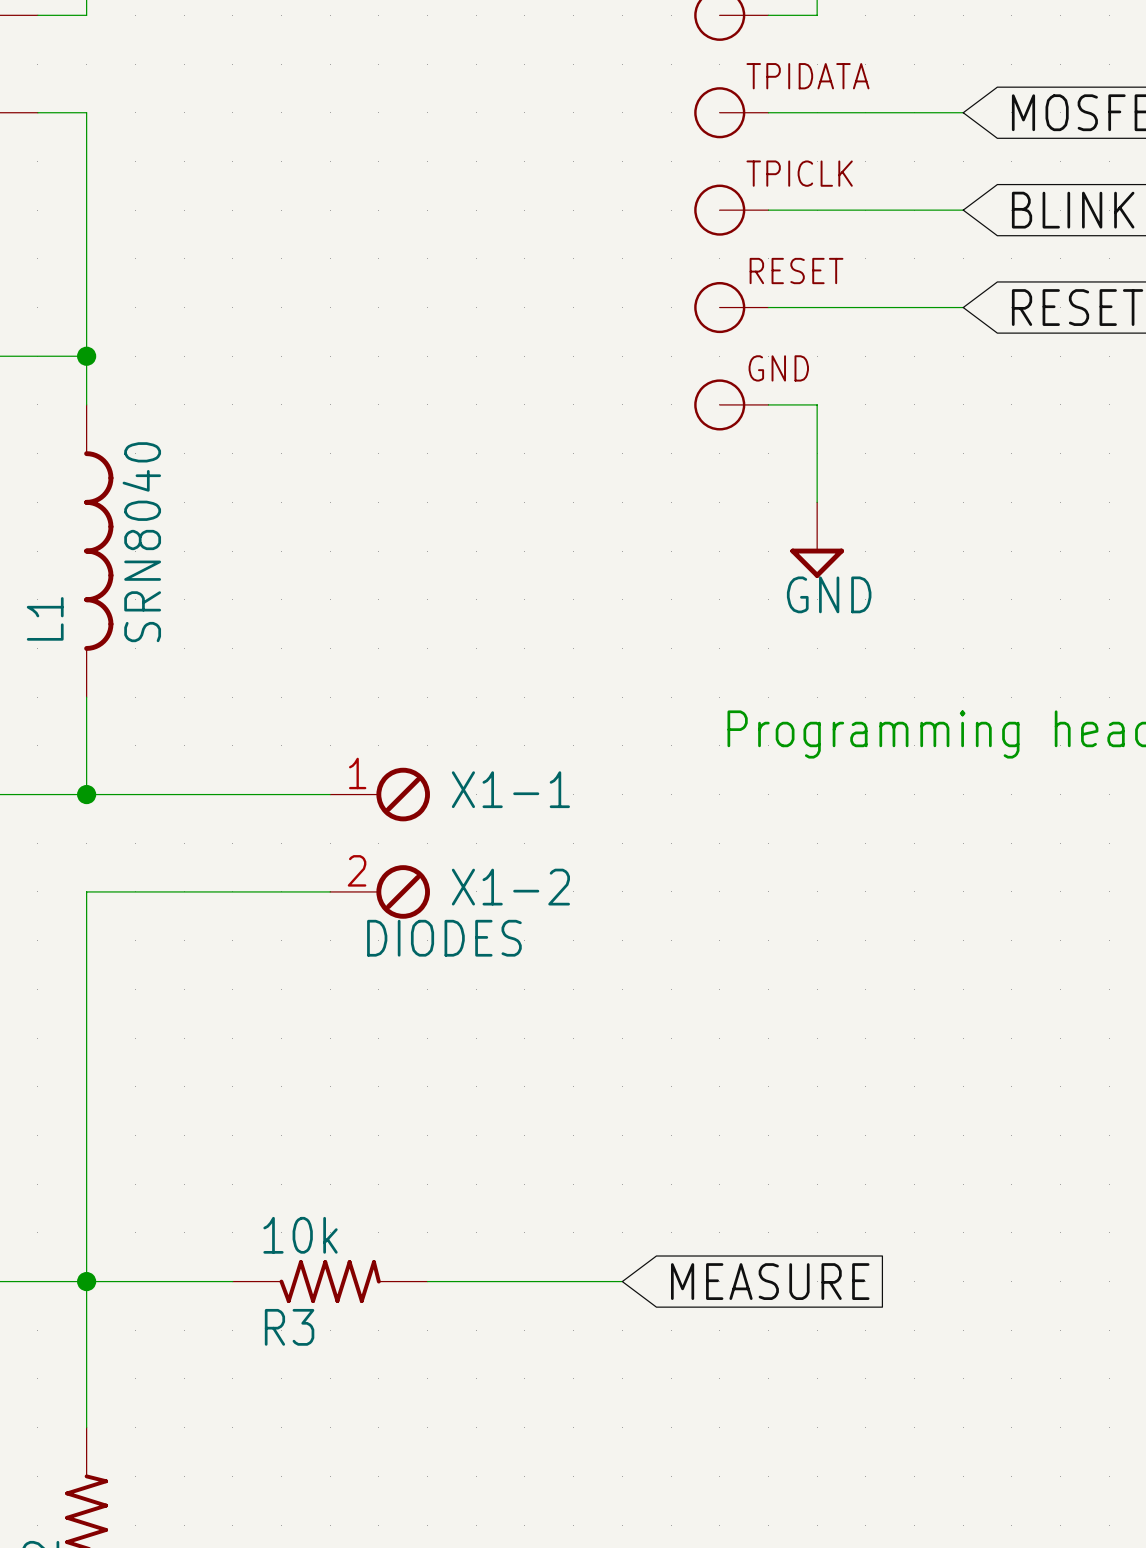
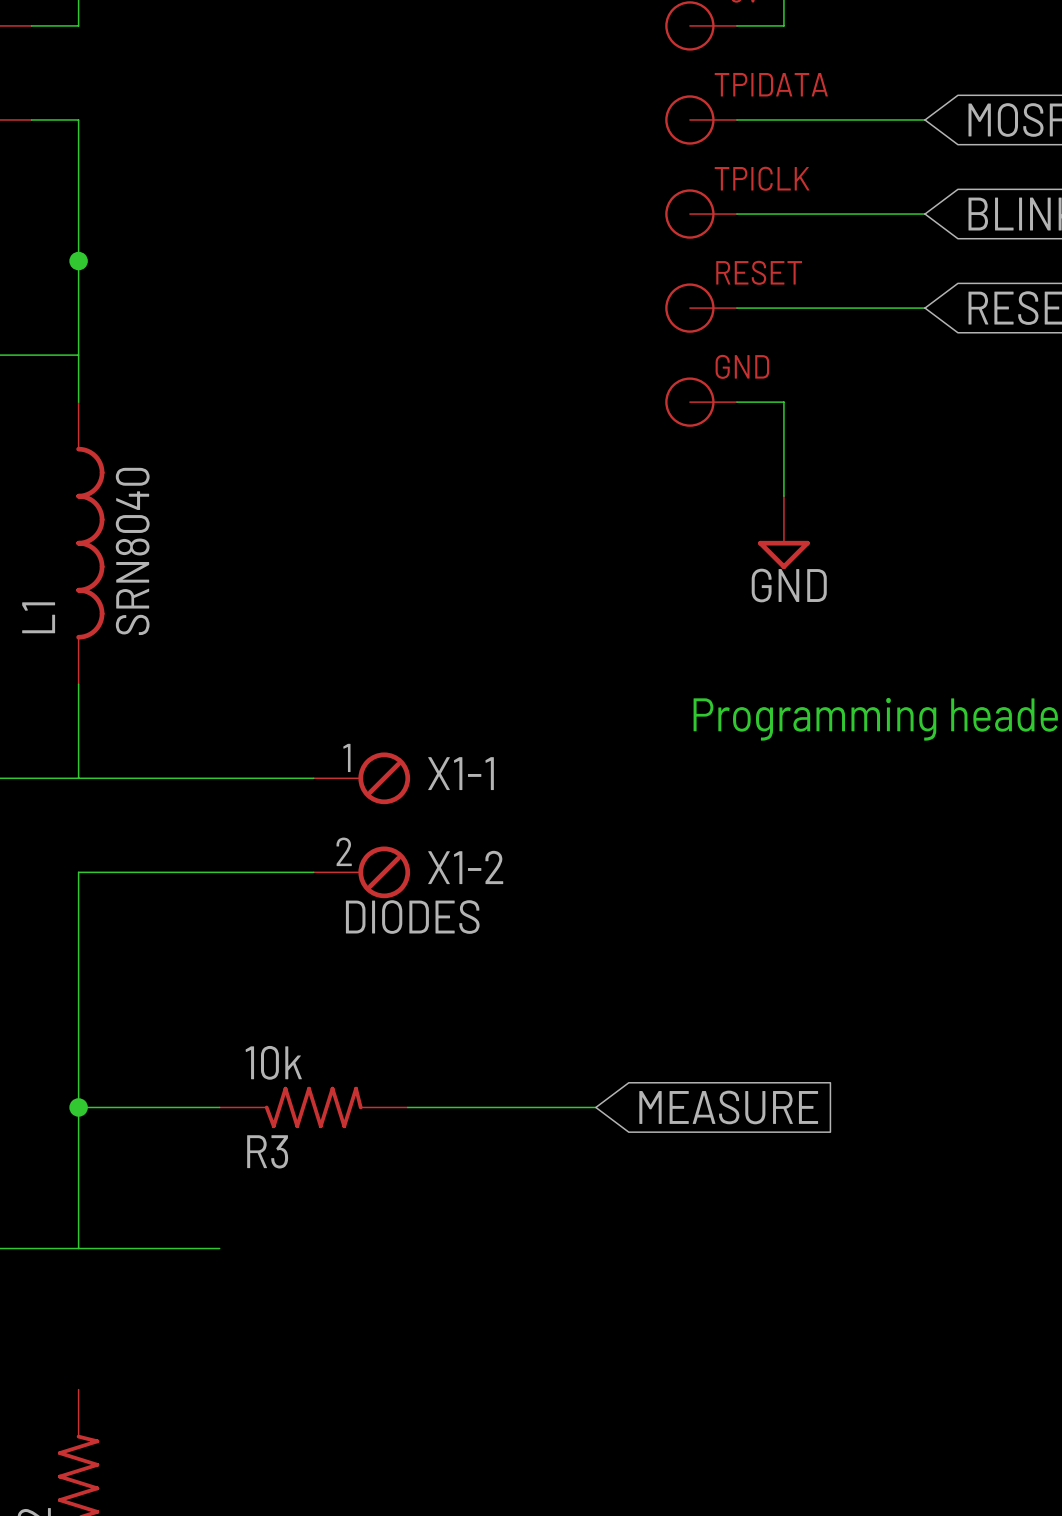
junction position: (86, 356) -> (78, 261)
junction: (86, 794) -> none
wire: none -> (78, 1107) (219, 1107)
junction: none -> (78, 1107)
wire: (86, 1281) (86, 1427) -> none
junction: (86, 1281) -> none
R3 position: (330, 1281) -> (313, 1107)
wire: (427, 1281) (622, 1281) -> (407, 1107) (595, 1107)
global label position: MEASURE (770, 1281) -> MEASURE (728, 1107)

